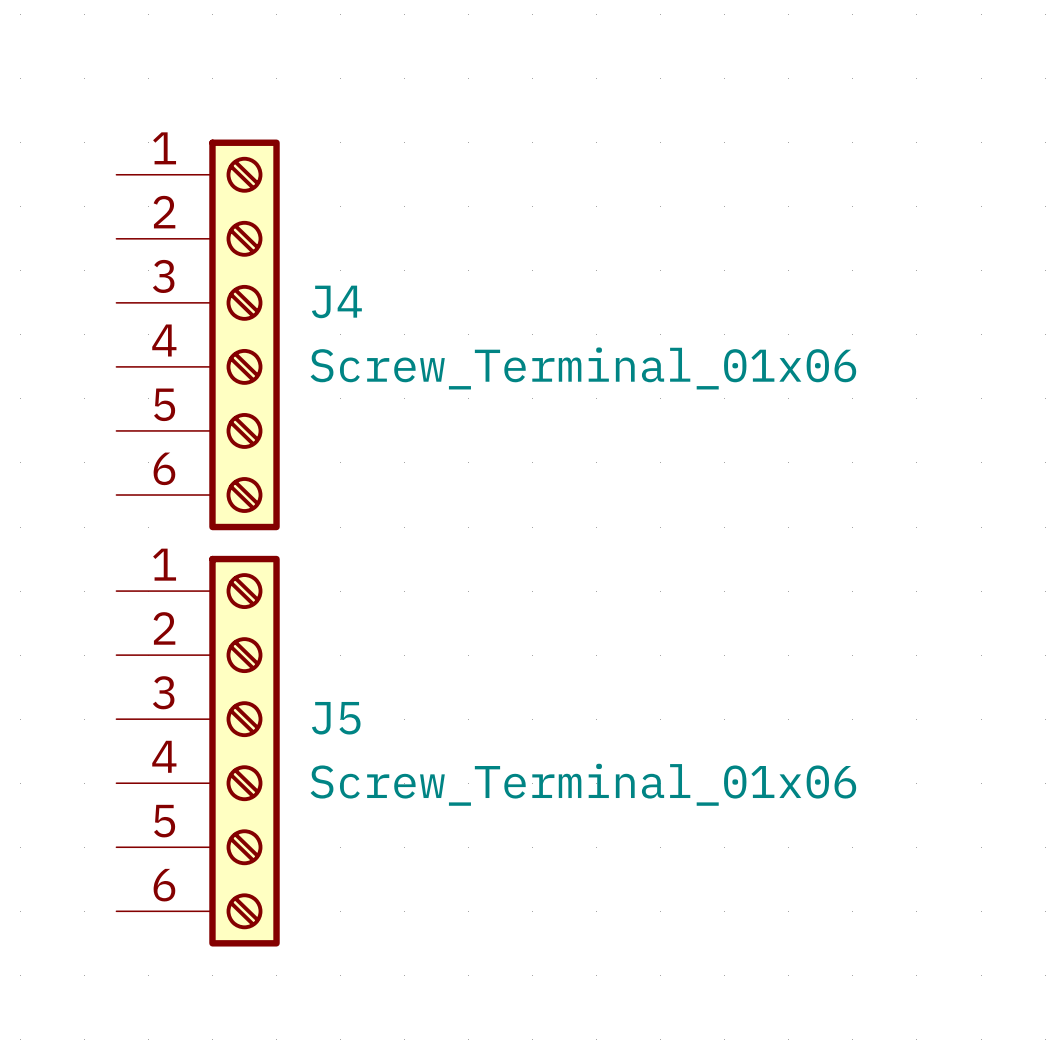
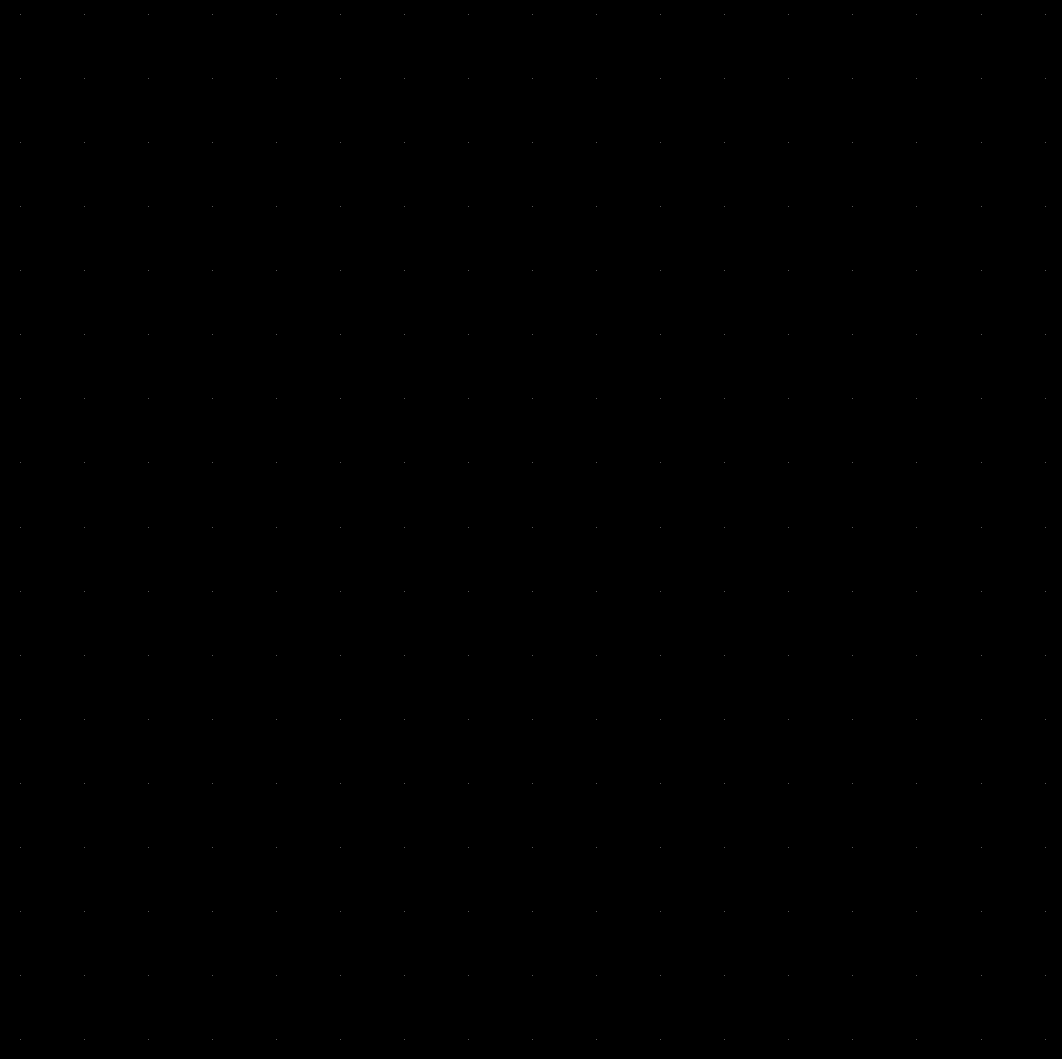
J4: Screw_Terminal_01x06 (198, 334) -> none
J5: Screw_Terminal_01x06 (198, 751) -> none

